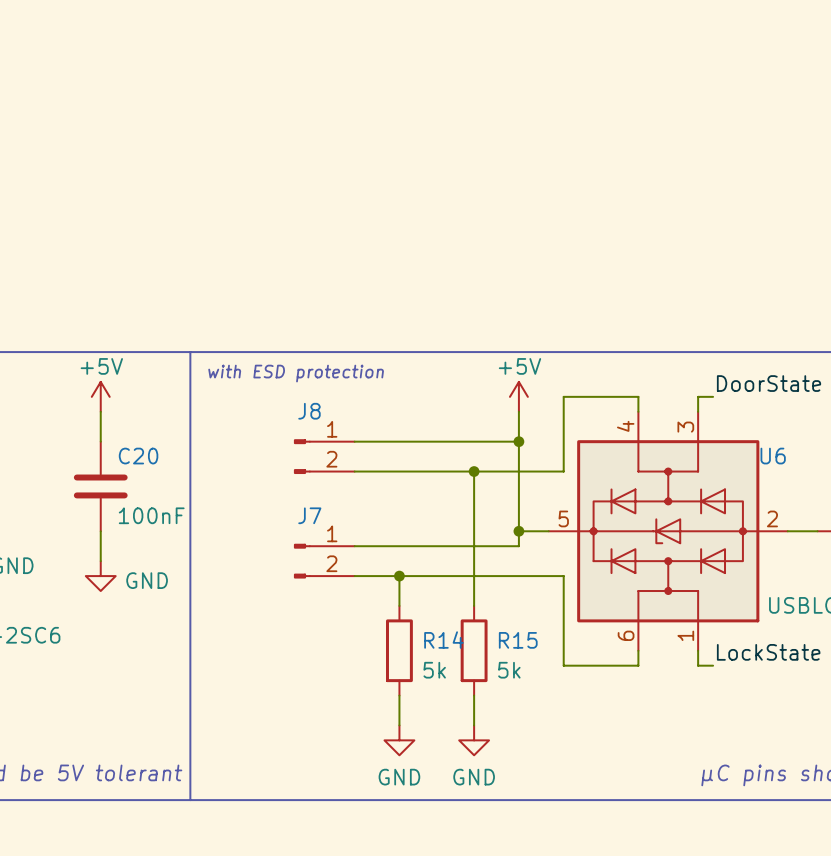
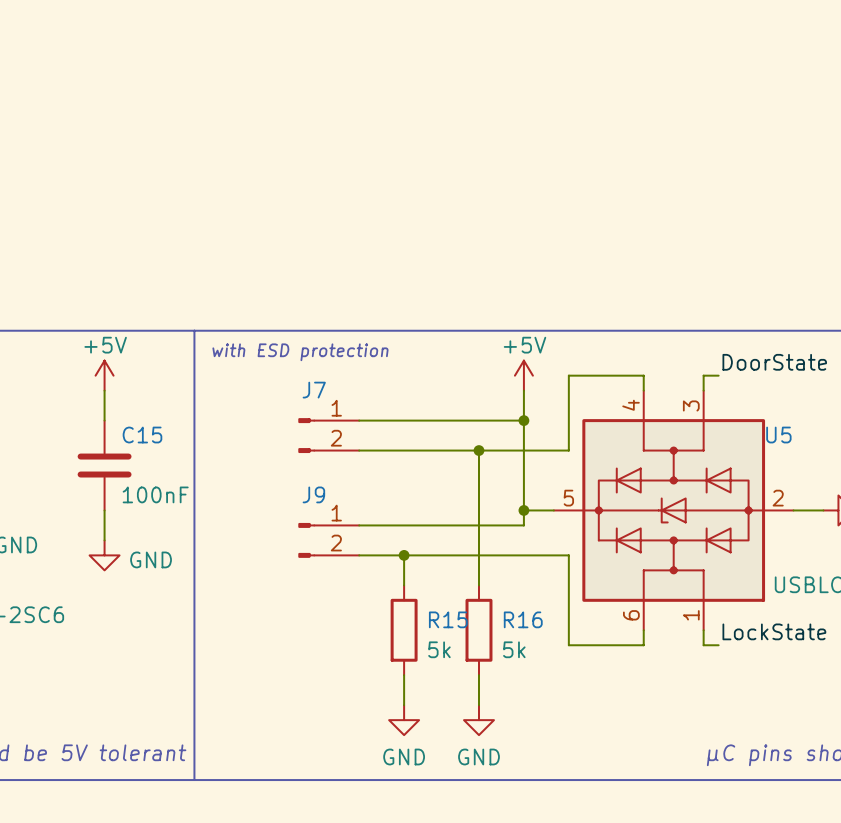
J8 name: J8 (309, 411) -> J7 (314, 390)
C20 name: C20 (138, 456) -> C15 (142, 435)
U6 name: U6 (773, 456) -> U5 (778, 435)
J7 name: J7 (309, 515) -> J9 (313, 494)
R14 name: R14 (443, 640) -> R15 (448, 619)
R15 name: R15 (518, 640) -> R16 (523, 619)

